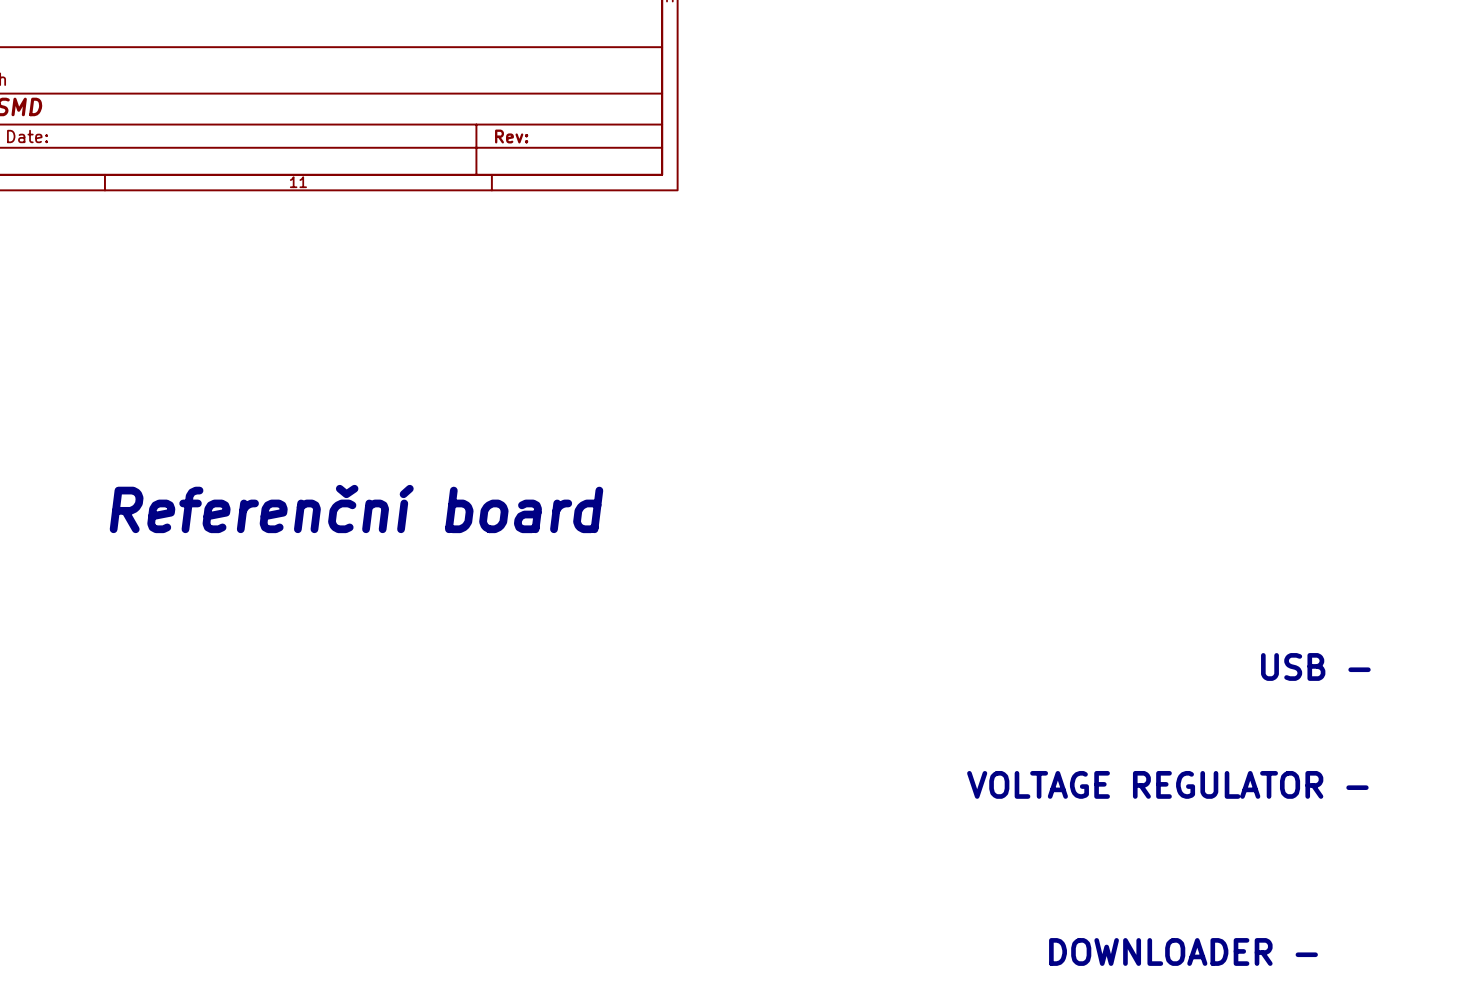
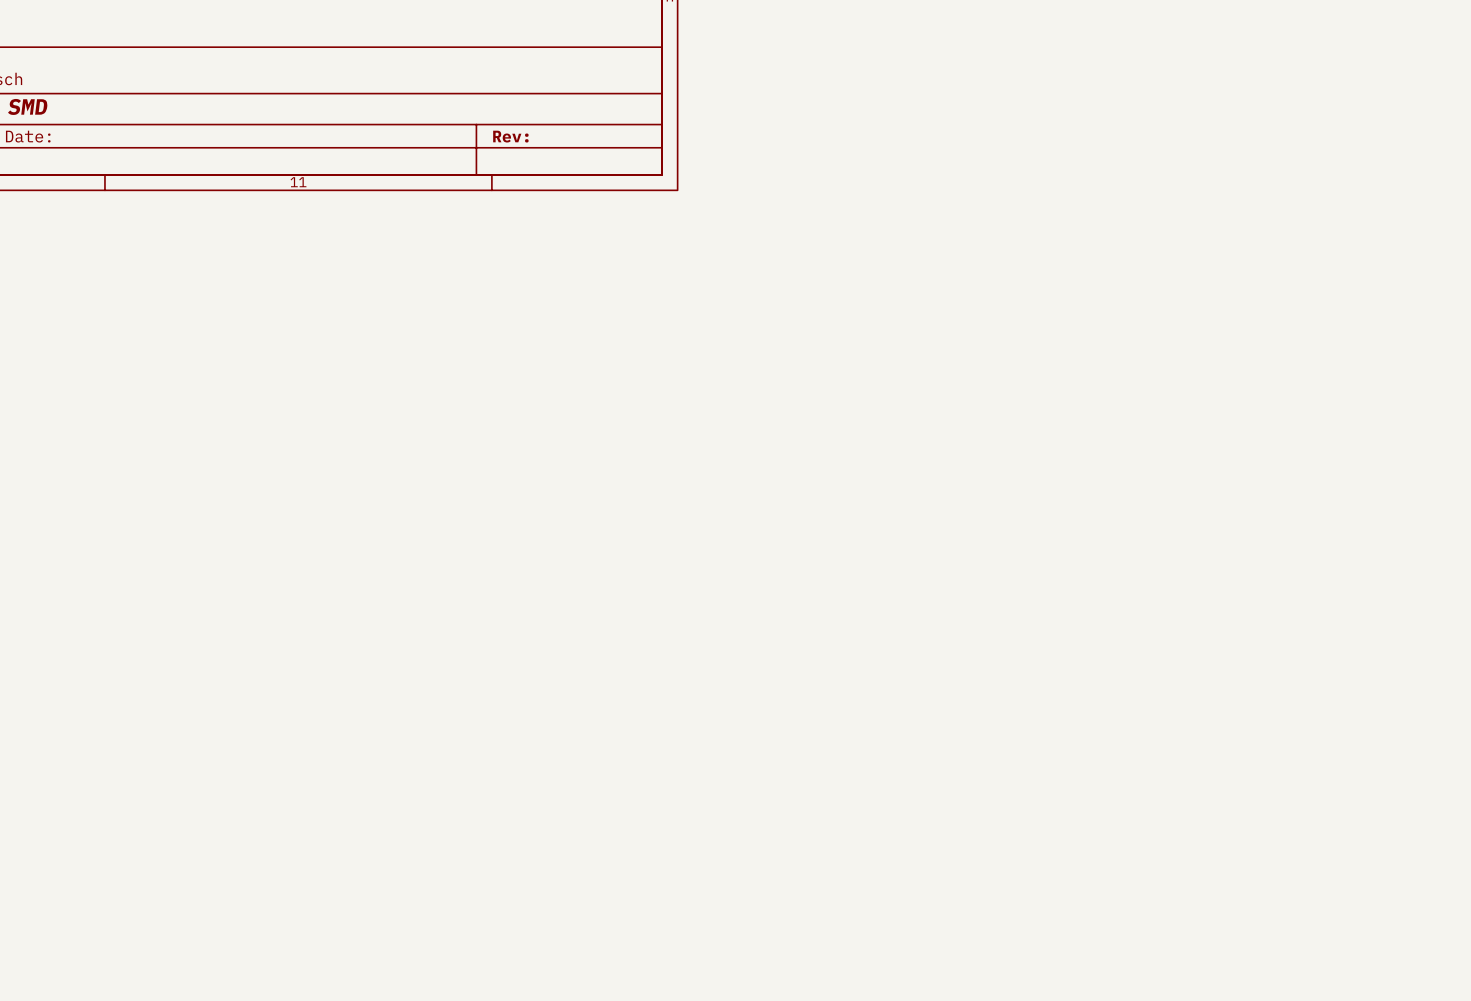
text: Referenční board (356, 509) -> none
text: USB - (1315, 666) -> none
text: VOLTAGE REGULATOR - (1167, 784) -> none
text: DOWNLOADER - (1183, 951) -> none

